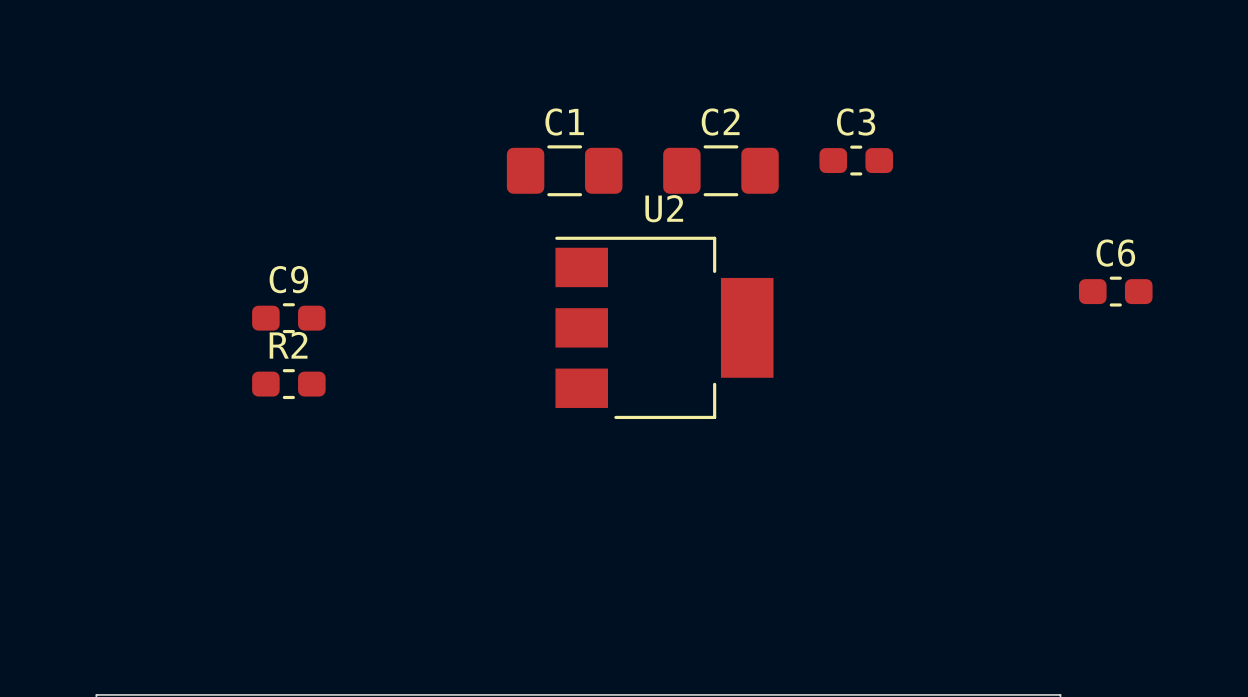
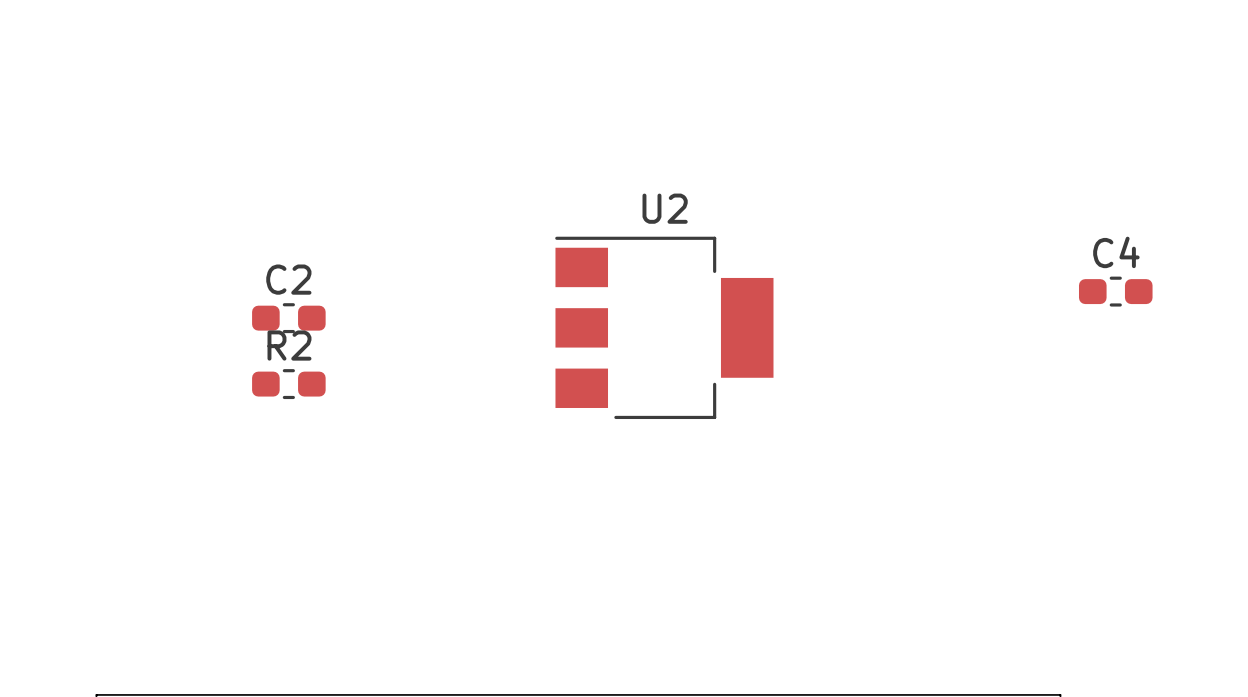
C3: (856, 160) -> none
C1: (564, 170) -> none
C2: (720, 170) -> none
C6 name: C6 (1115, 253) -> C4 (1116, 252)
C9 name: C9 (288, 279) -> C2 (288, 279)

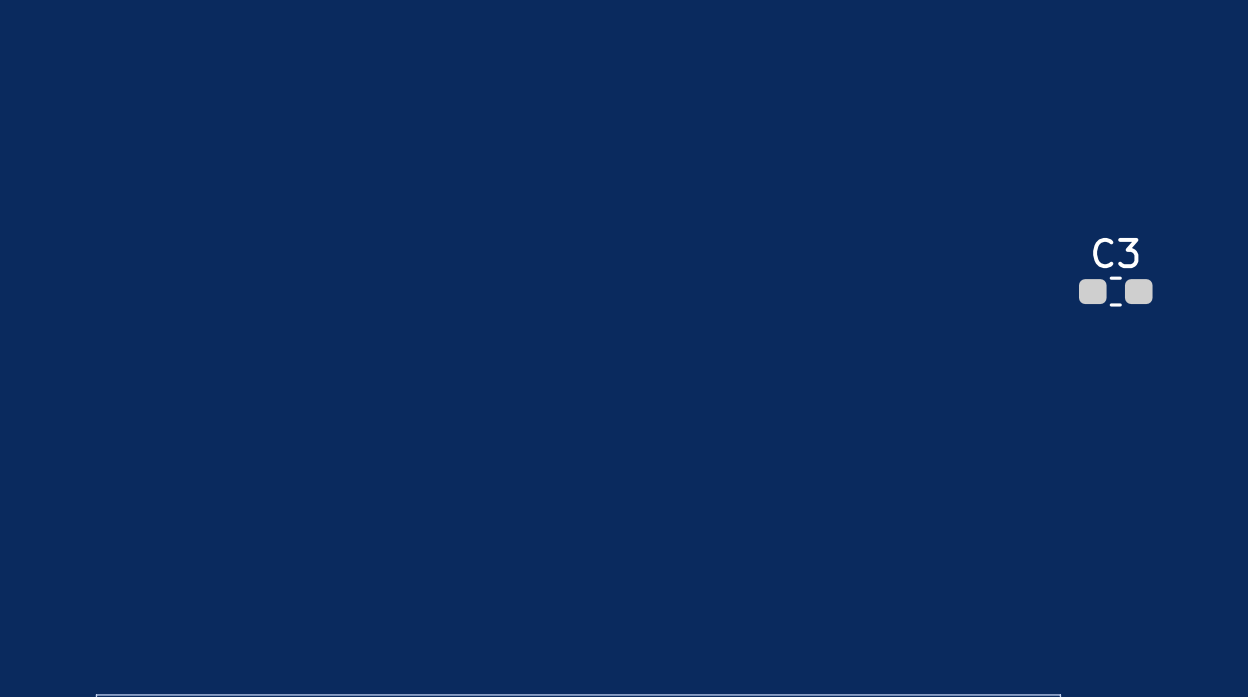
C4 name: C4 (1116, 252) -> C3 (1115, 253)
C2: (288, 318) -> none
U2: (664, 327) -> none
R2: (288, 384) -> none

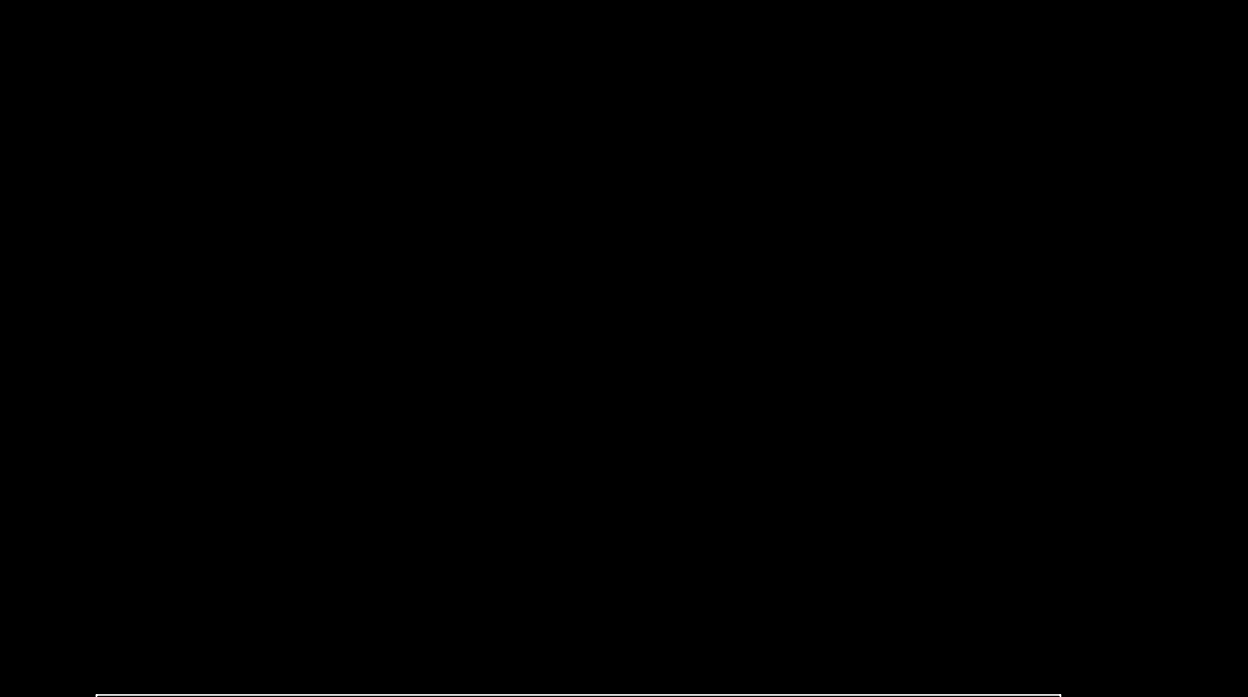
C3: (1115, 291) -> none

